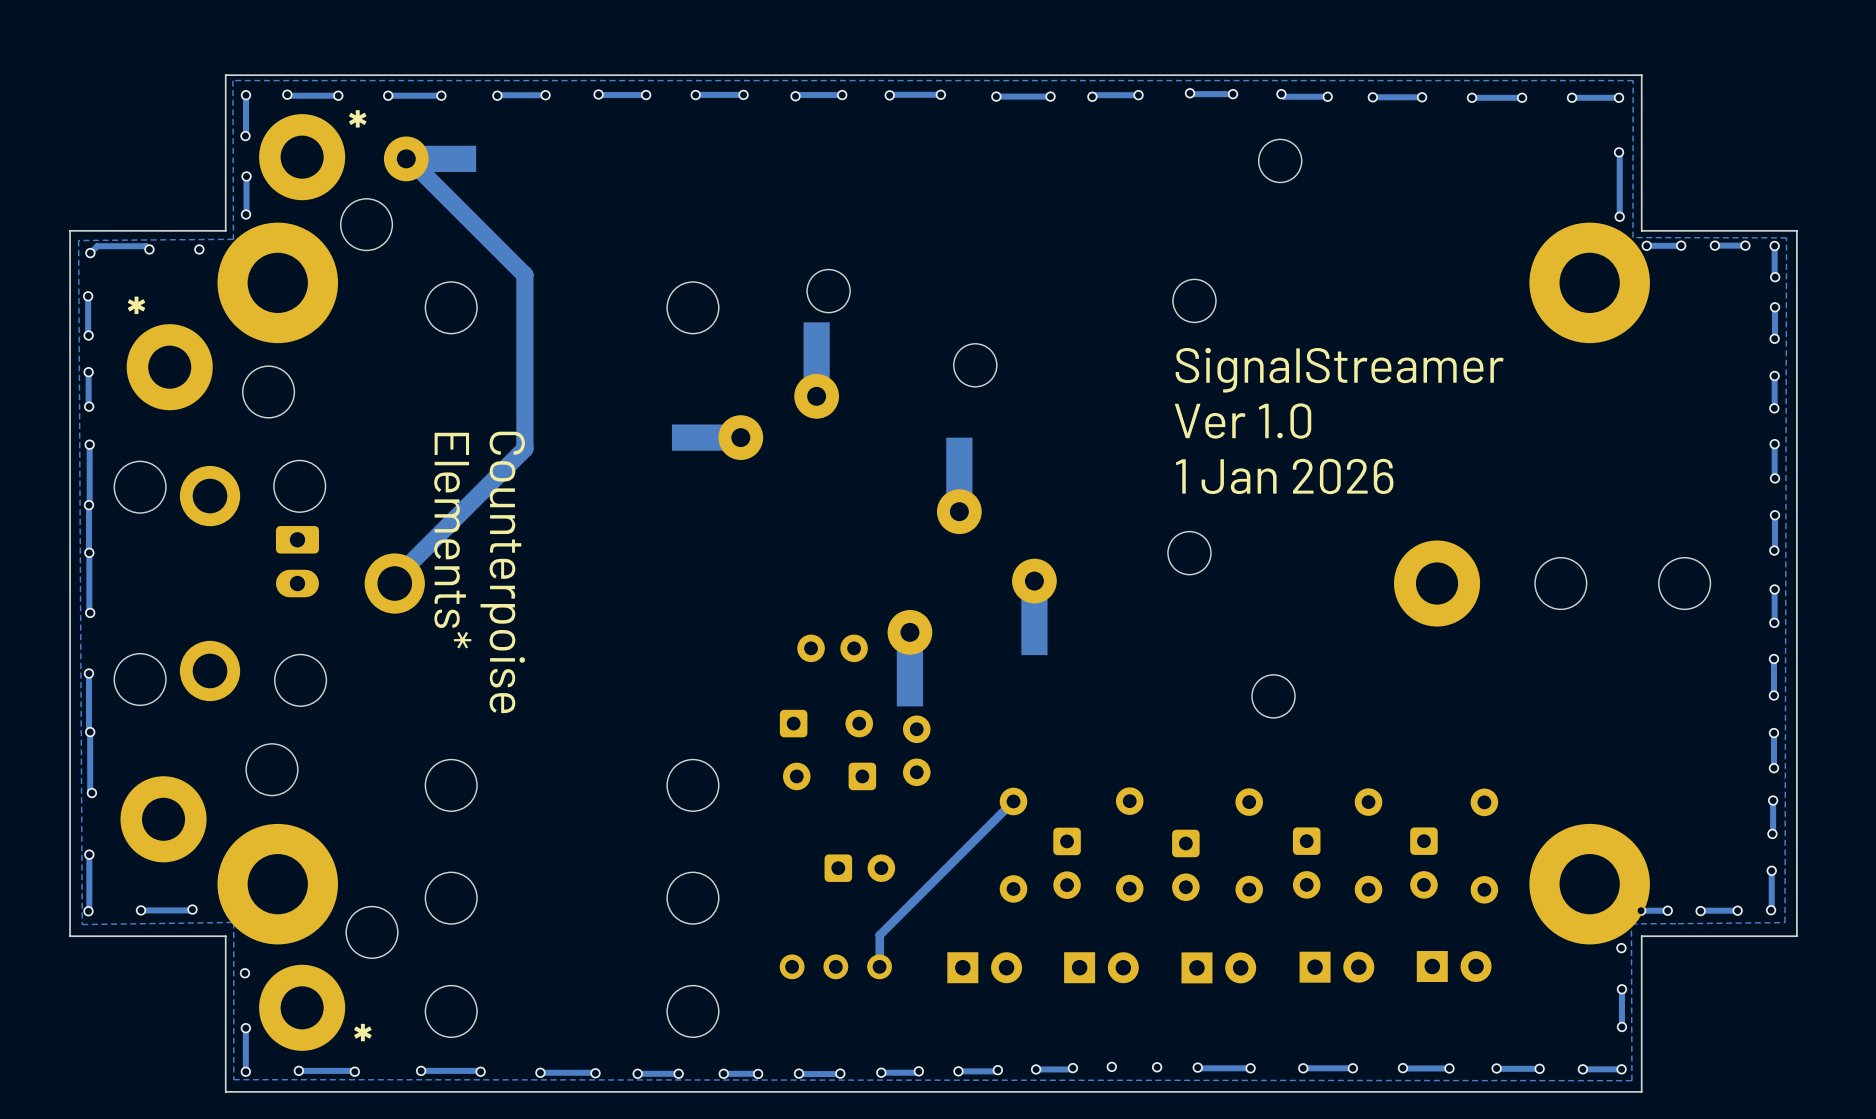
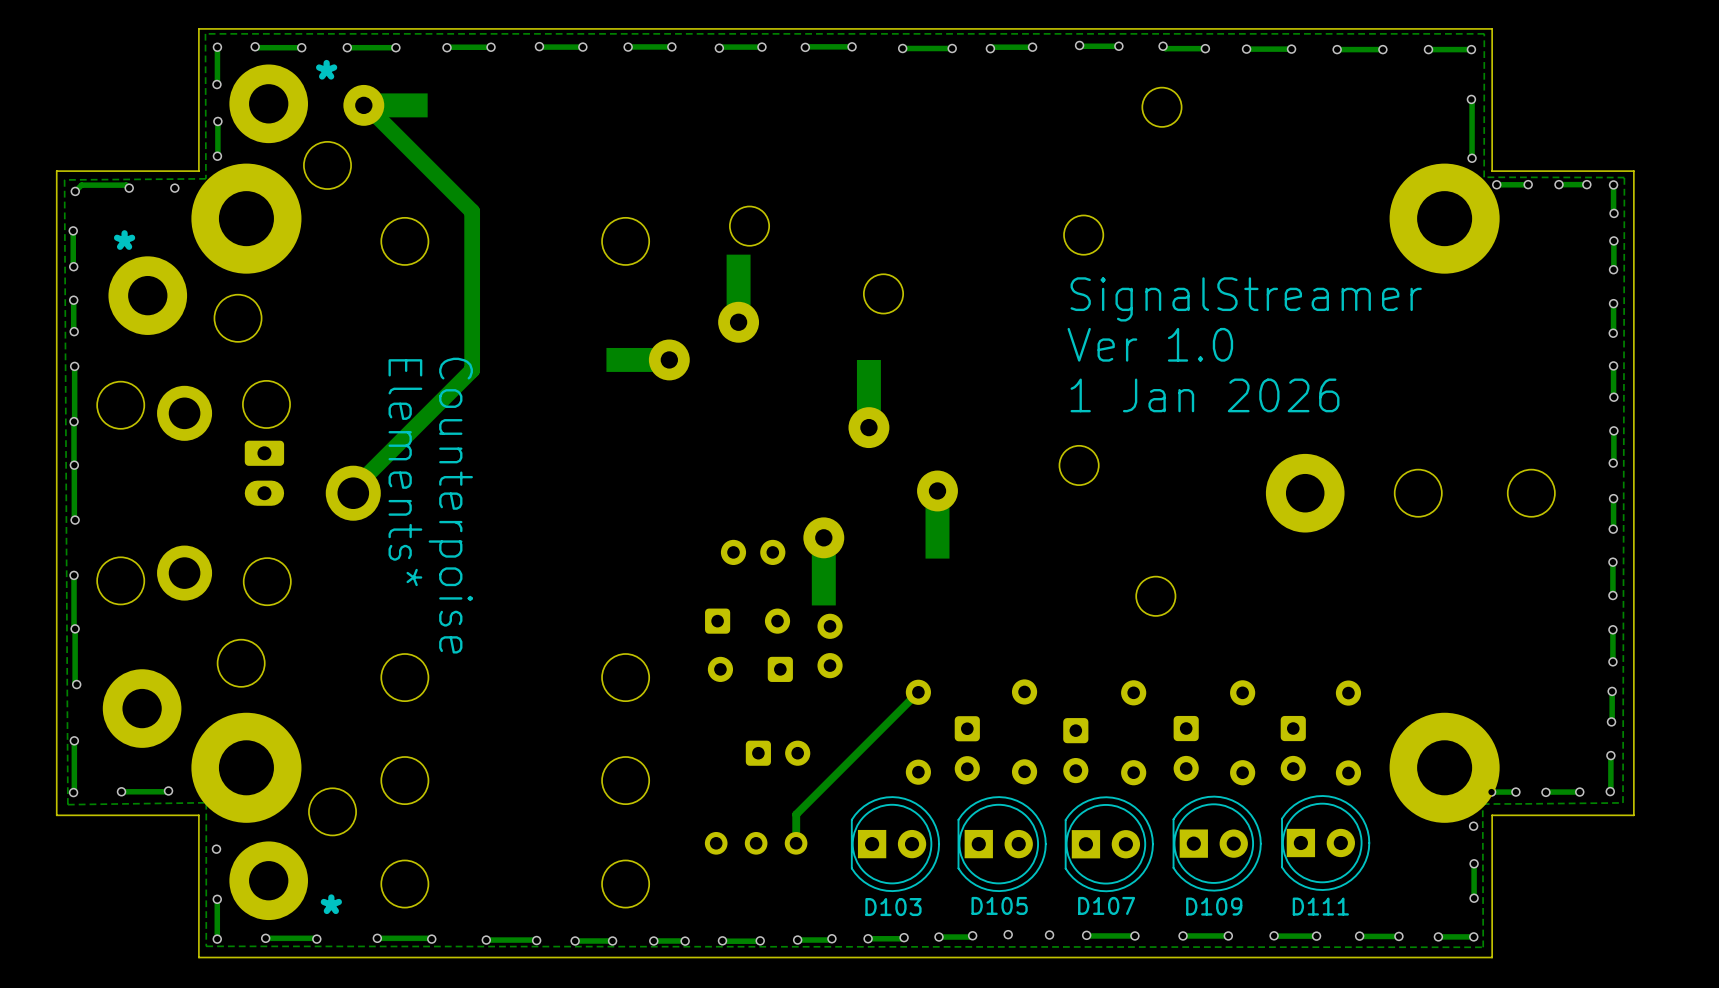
part footprint: [1299, 951, 1375, 983] -> [1172, 795, 1262, 892]
part footprint: [1416, 951, 1492, 983] -> [1281, 795, 1371, 891]
part footprint: [947, 952, 1023, 984] -> [850, 796, 941, 893]
part footprint: [1064, 952, 1139, 984] -> [957, 796, 1047, 893]
part footprint: [1181, 952, 1257, 984] -> [1064, 796, 1154, 893]
text: none -> D105 (999, 905)
text: none -> D107 (1106, 905)
text: none -> D103 (893, 907)
text: none -> D109 (1214, 906)
text: none -> D111 (1320, 906)

